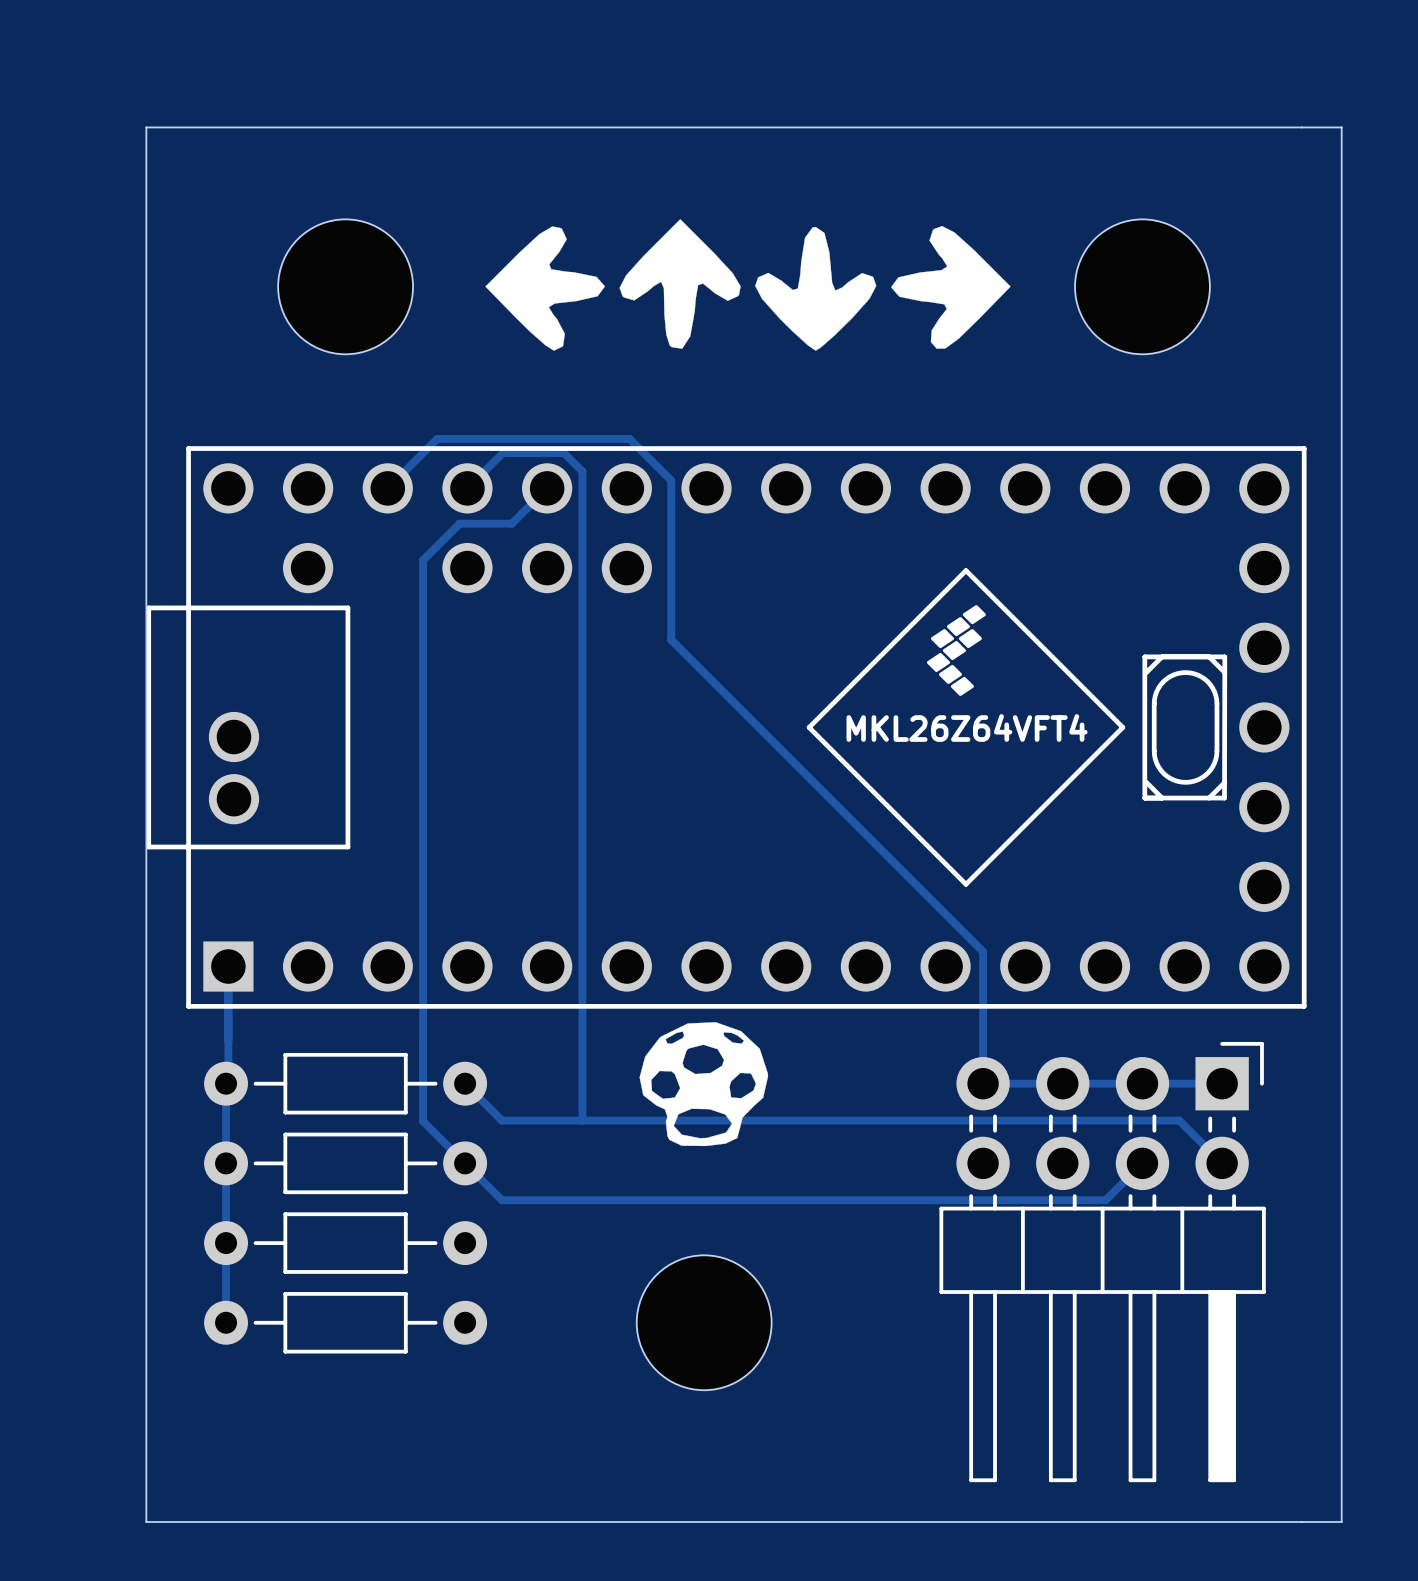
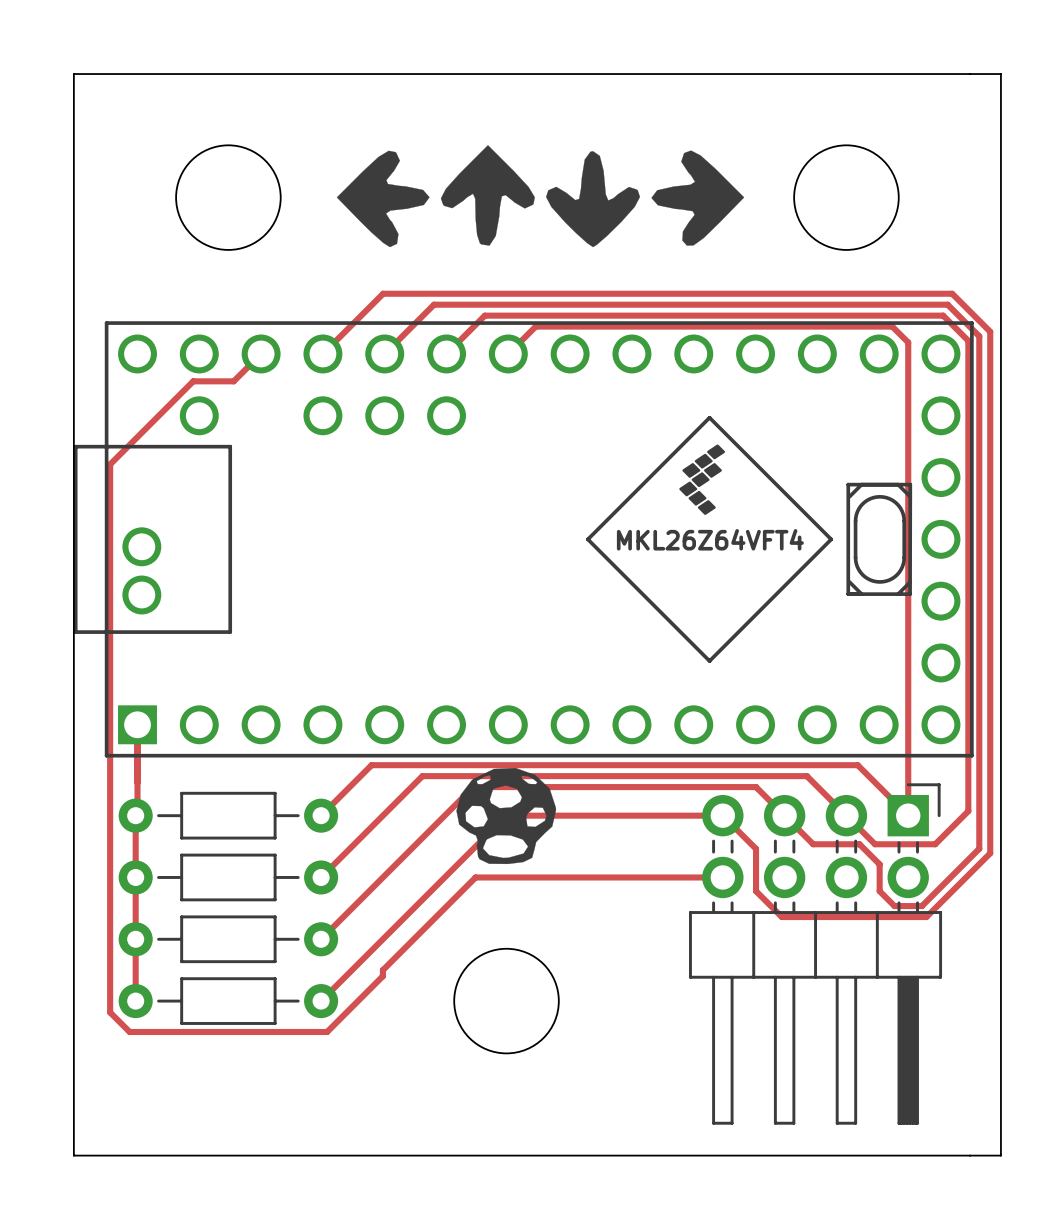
track: (502, 453) (564, 453) (582, 471) (581, 1120) -> (350, 326) (383, 293) (952, 293) (990, 331) (990, 853) (926, 917) (781, 917) (756, 891) (756, 848) (722, 815) (506, 815) (321, 1001)
track: (387, 488) (437, 438) (629, 438) (671, 480) (671, 639) (983, 951) (983, 1083) (1222, 1083) -> (261, 353) (233, 381) (193, 381) (110, 464) (110, 1012) (129, 1031) (327, 1031) (382, 976) (382, 970) (475, 877) (722, 877)
track: (547, 488) (511, 523) (459, 523) (423, 560) (423, 1121) (501, 1200) (1105, 1200) (1142, 1163) -> (384, 353) (434, 304) (947, 304) (979, 336) (979, 848) (921, 906) (894, 906) (879, 891) (879, 864) (859, 844)
track: none -> (446, 353) (484, 315) (943, 315) (968, 340) (968, 811) (935, 844) (875, 844) (806, 776) (422, 776) (321, 877)
track: none -> (508, 353) (535, 326) (892, 326) (908, 342) (908, 815) (857, 765) (371, 765) (321, 815)
track: (465, 1083) (501, 1120) (1099, 1120) -> (321, 939) (473, 787) (756, 787) (813, 844)
track: (1159, 1120) (1179, 1120) (1222, 1163) -> none

